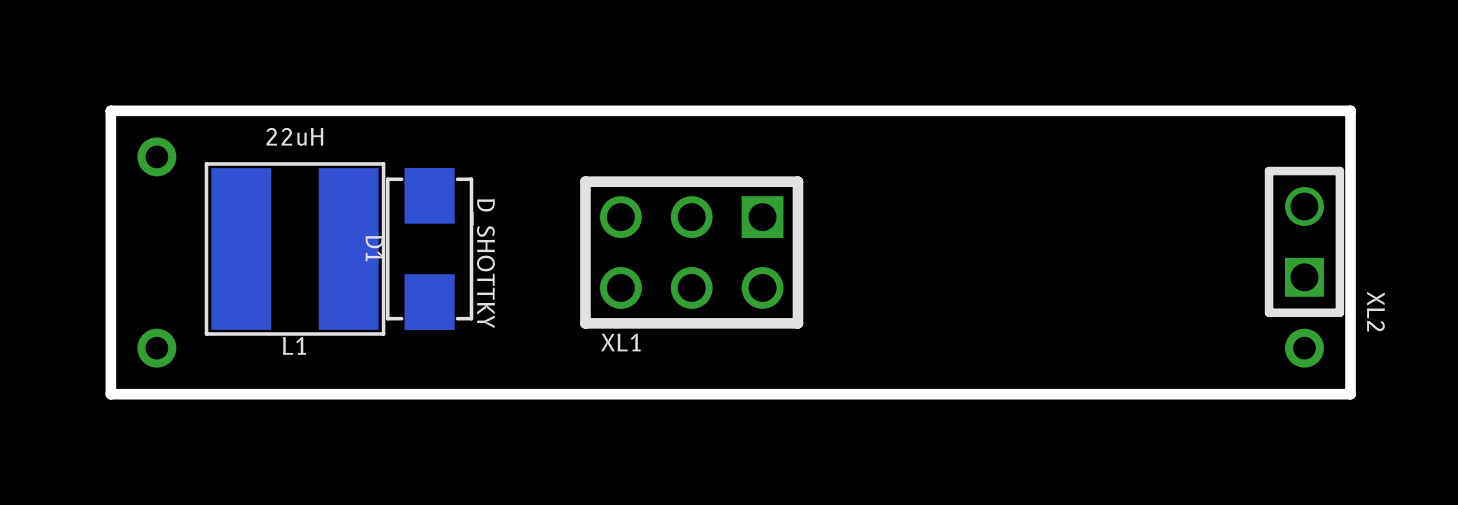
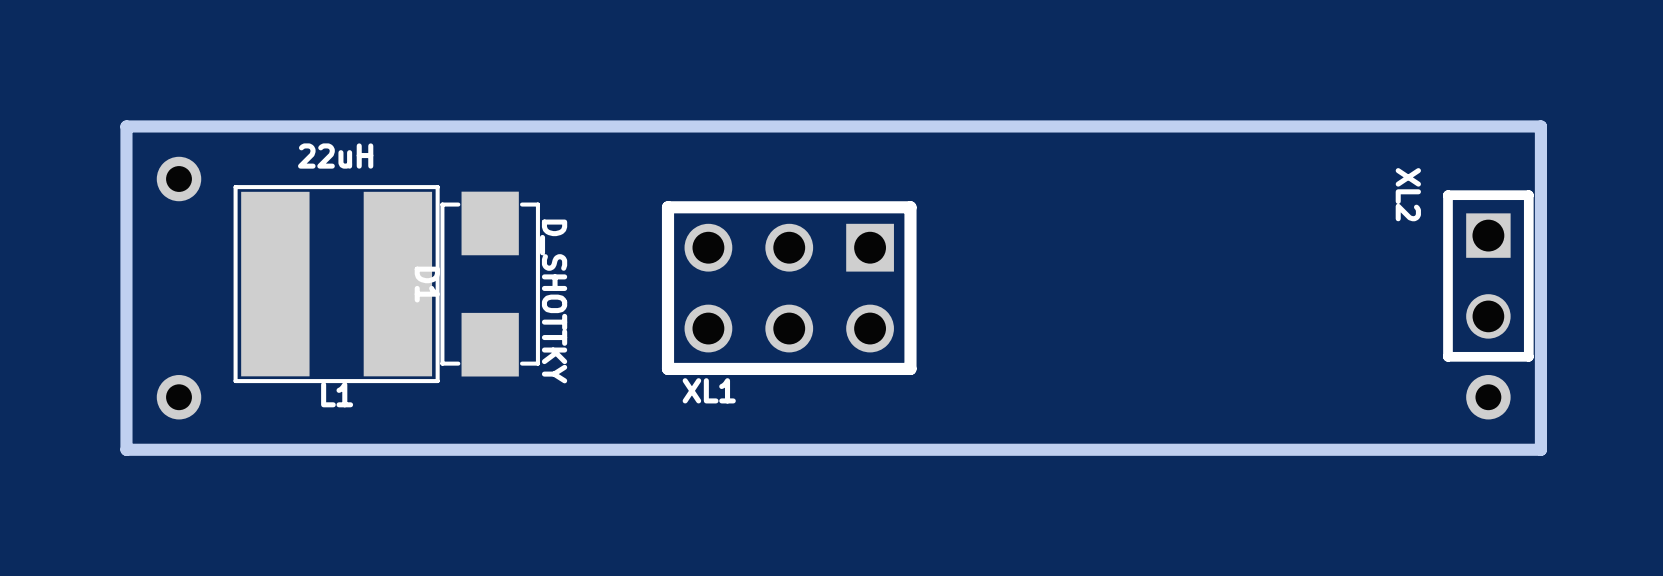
XL2 rotation: 0° (1304, 241) -> 180° (1488, 275)

